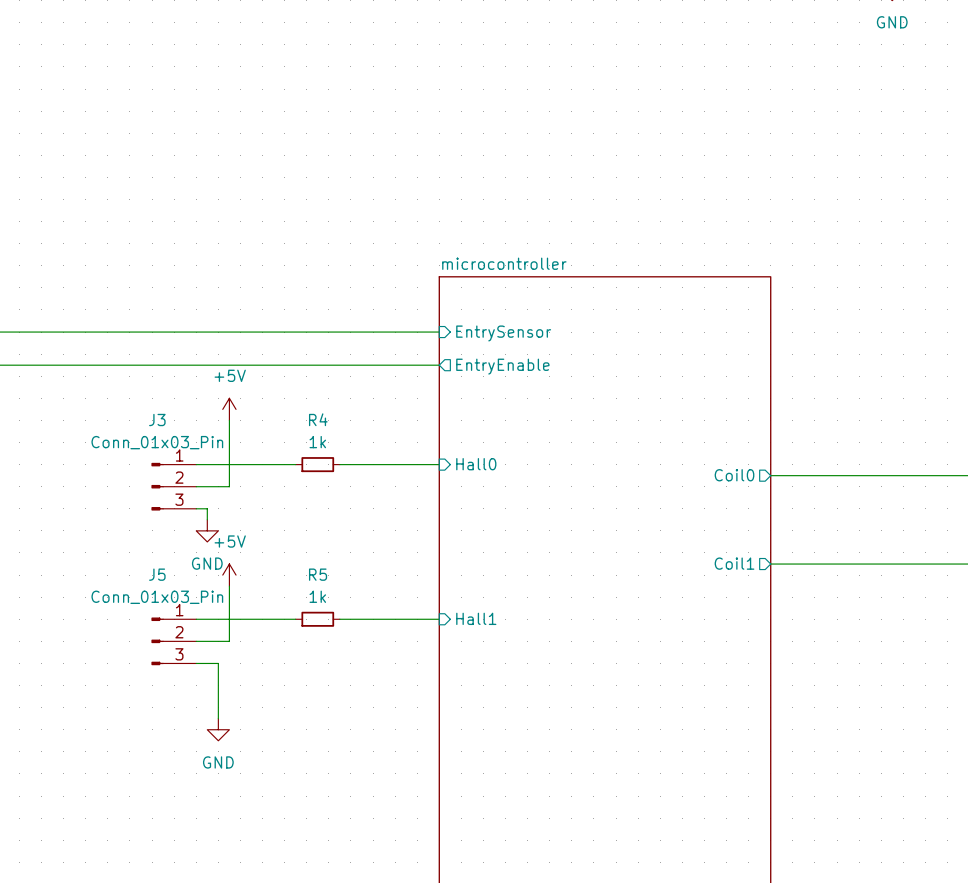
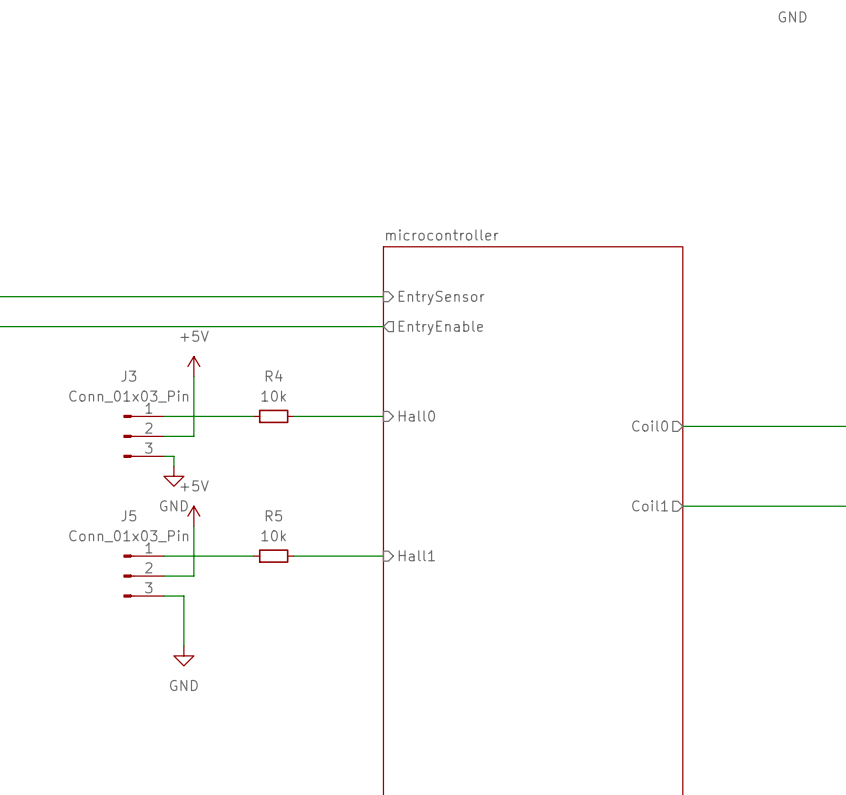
R4 value: 1k (317, 442) -> 10k (273, 396)
R5 value: 1k (317, 596) -> 10k (273, 535)

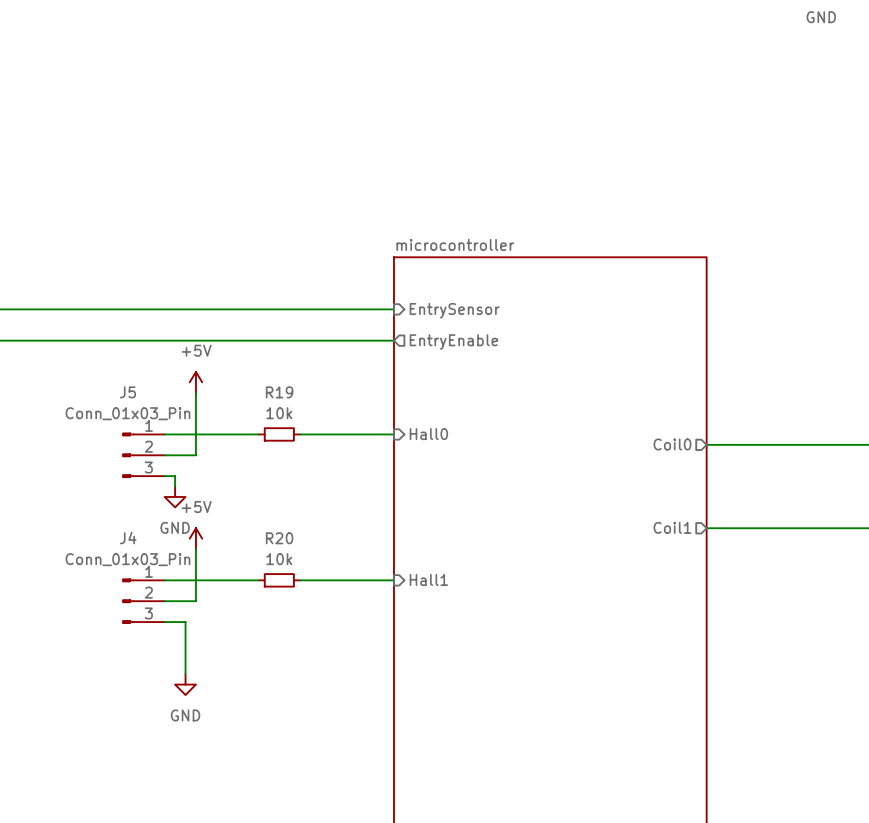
R4 name: R4 (274, 375) -> R19 (279, 392)
J3 name: J3 (128, 376) -> J5 (127, 392)
J5 name: J5 (128, 515) -> J4 (128, 538)
R5 name: R5 (273, 515) -> R20 (279, 538)

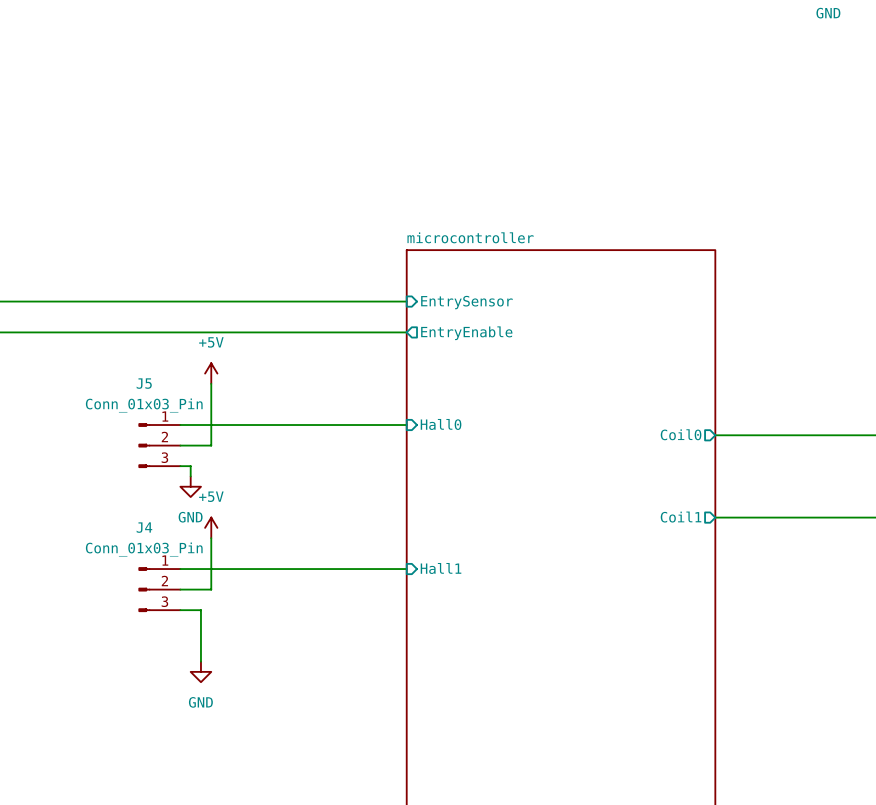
wire: none -> (272, 425) (314, 425)
R19: 10k (279, 434) -> none
wire: none -> (272, 569) (314, 569)
R20: 10k (279, 580) -> none

